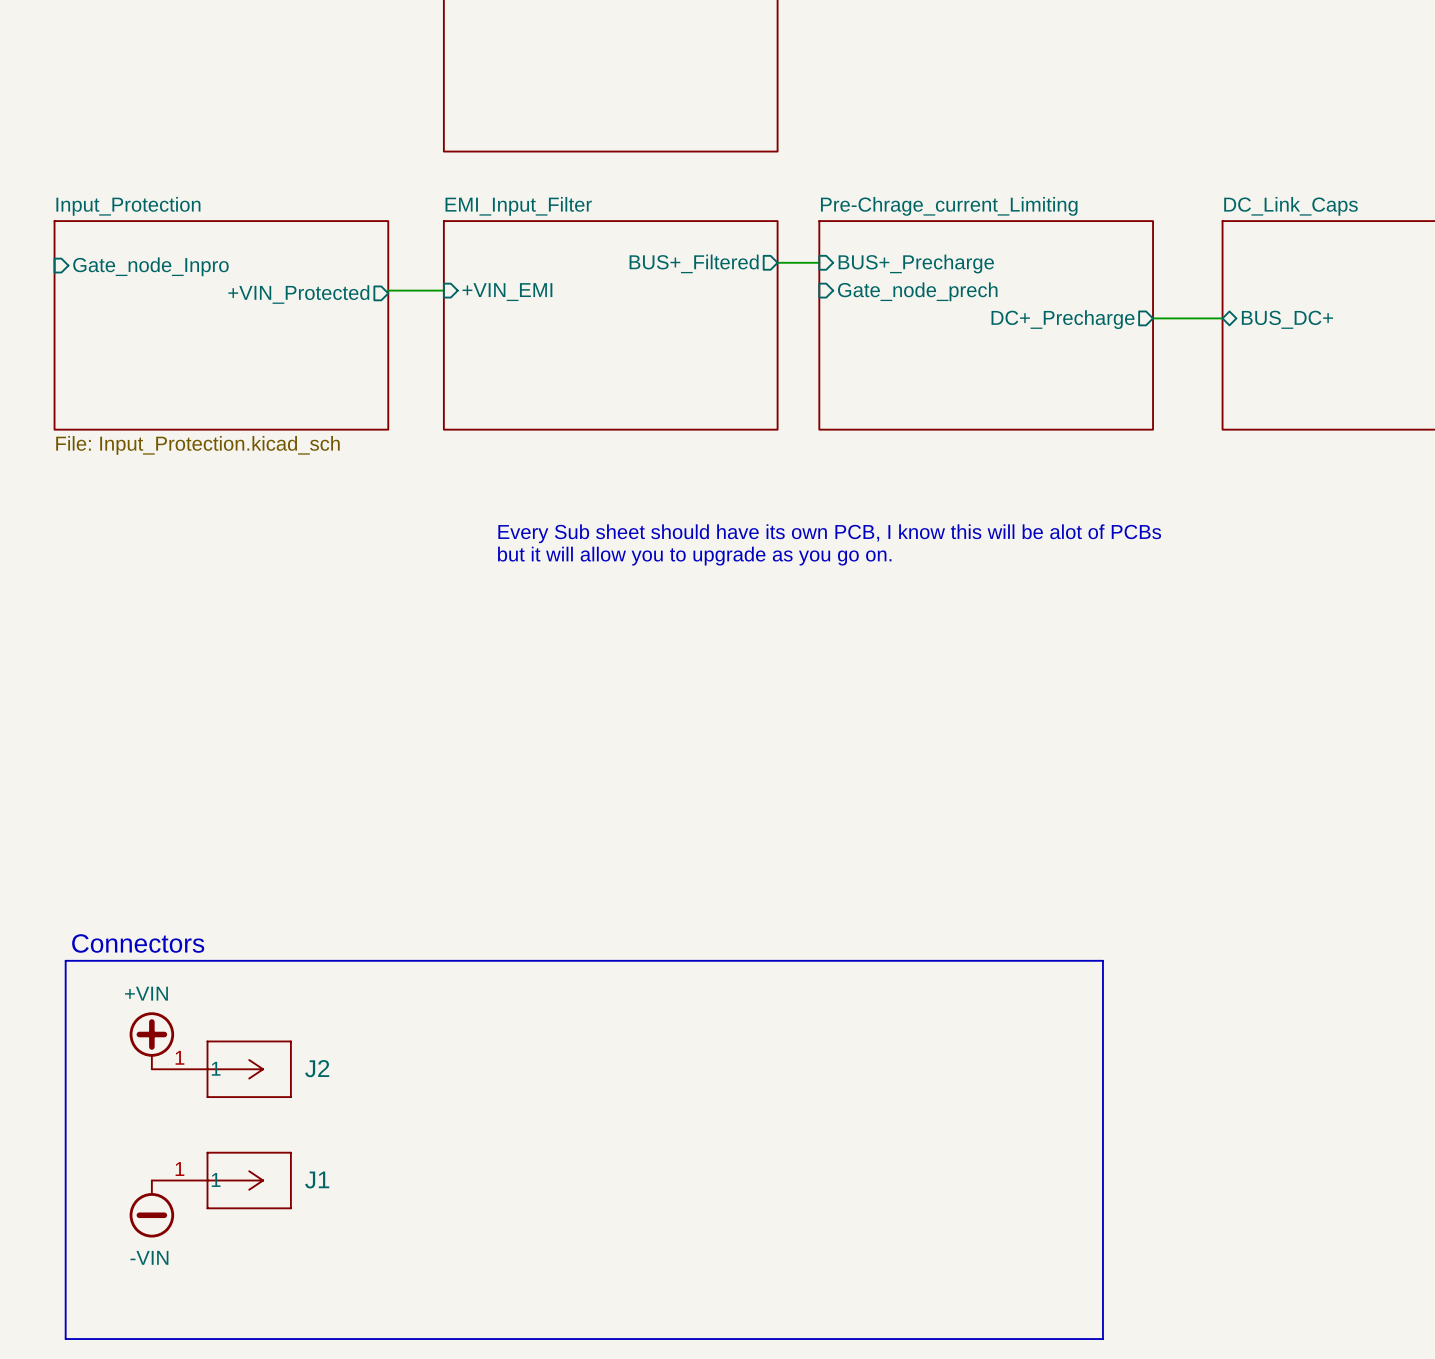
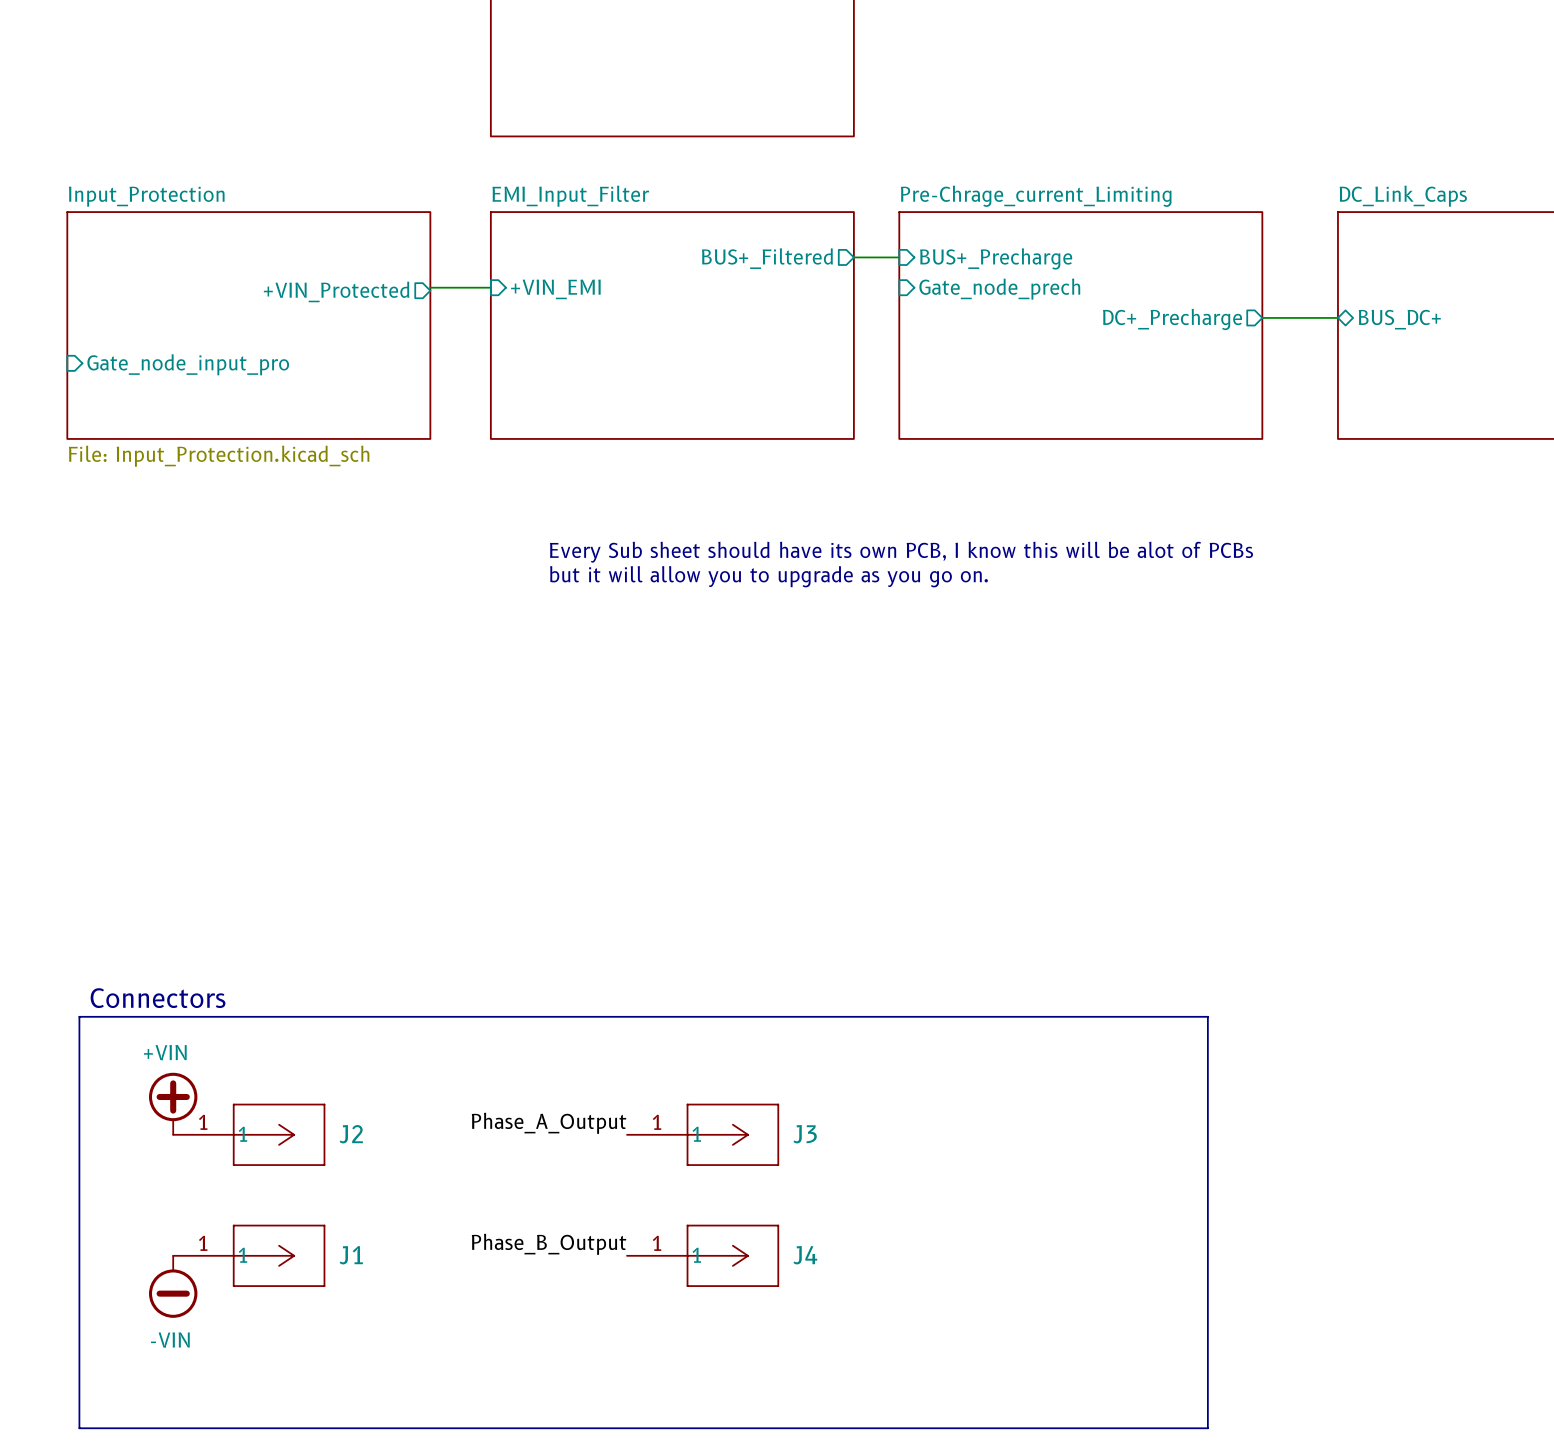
sheet pin: Gate_node_Inpro (150, 266) -> none
sheet pin: none -> Gate_node_input_pro (188, 364)
label: none -> Phase_A_Output (549, 1123)
J3: none -> (703, 1134)
label: none -> Phase_B_Output (549, 1244)
J4: none -> (703, 1255)

